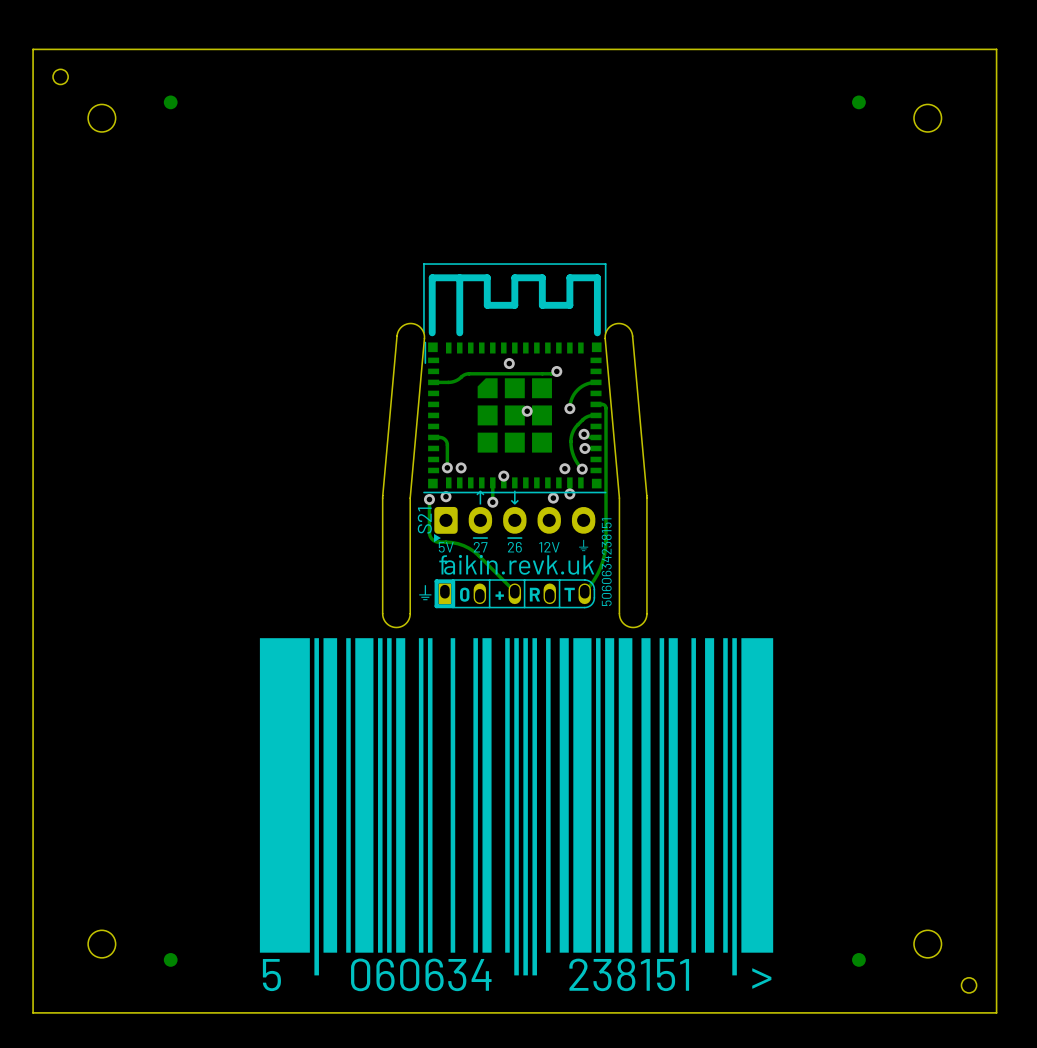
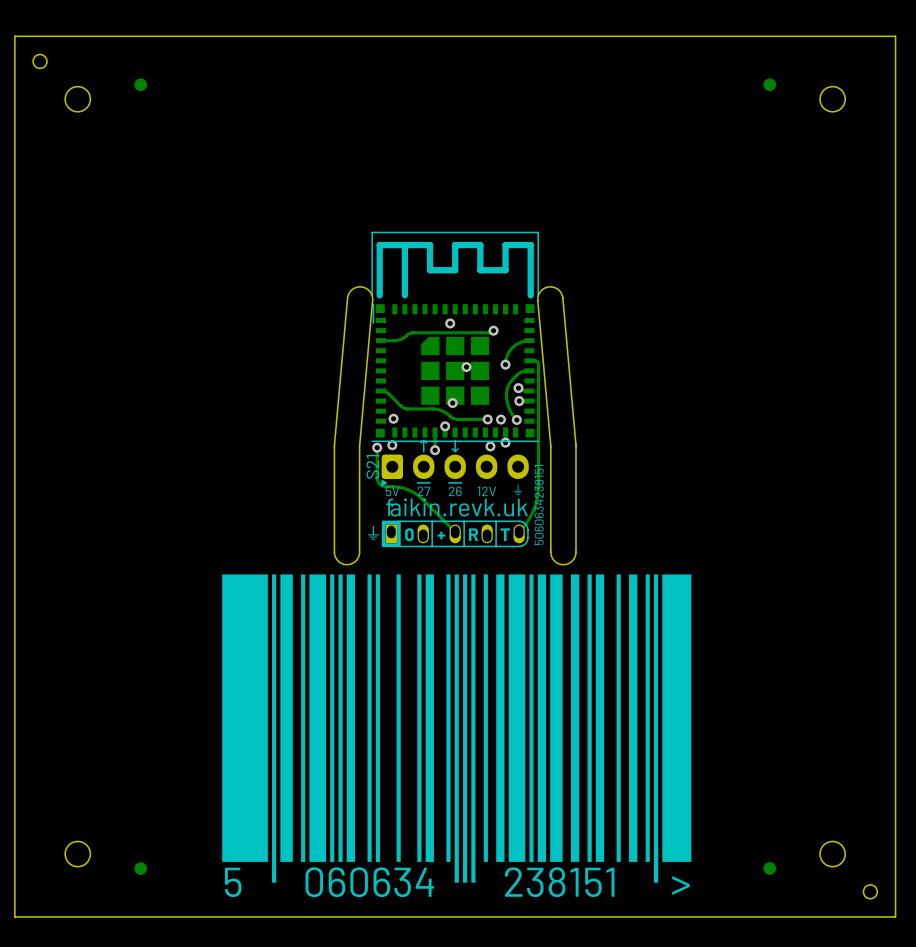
track: (433, 437) (442, 437) (446, 441) (447, 469) -> (380, 391) (387, 393) (405, 408) (438, 409) (456, 419) (487, 419)
via: none -> (452, 403)
via: (461, 467) -> none
via: none -> (487, 419)

